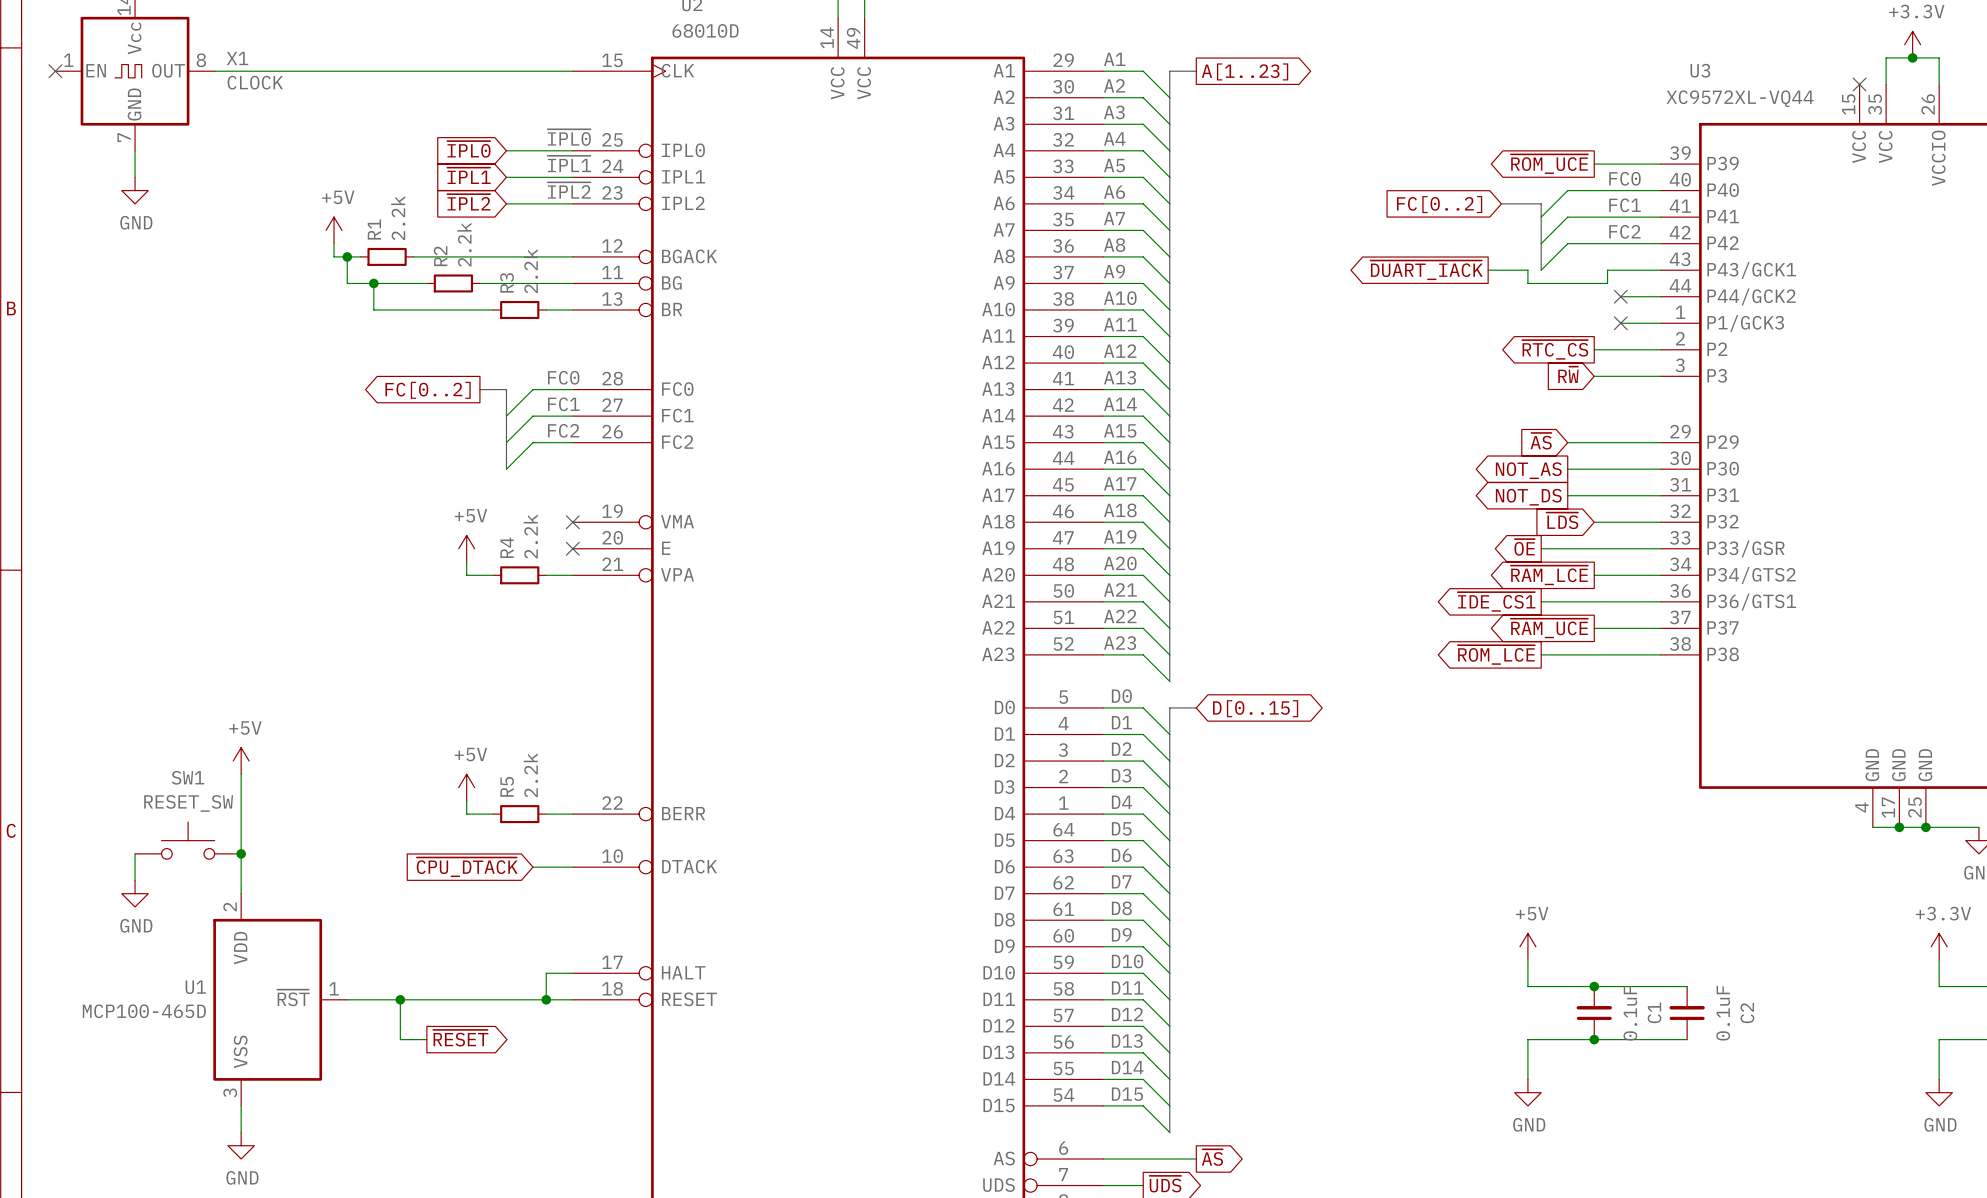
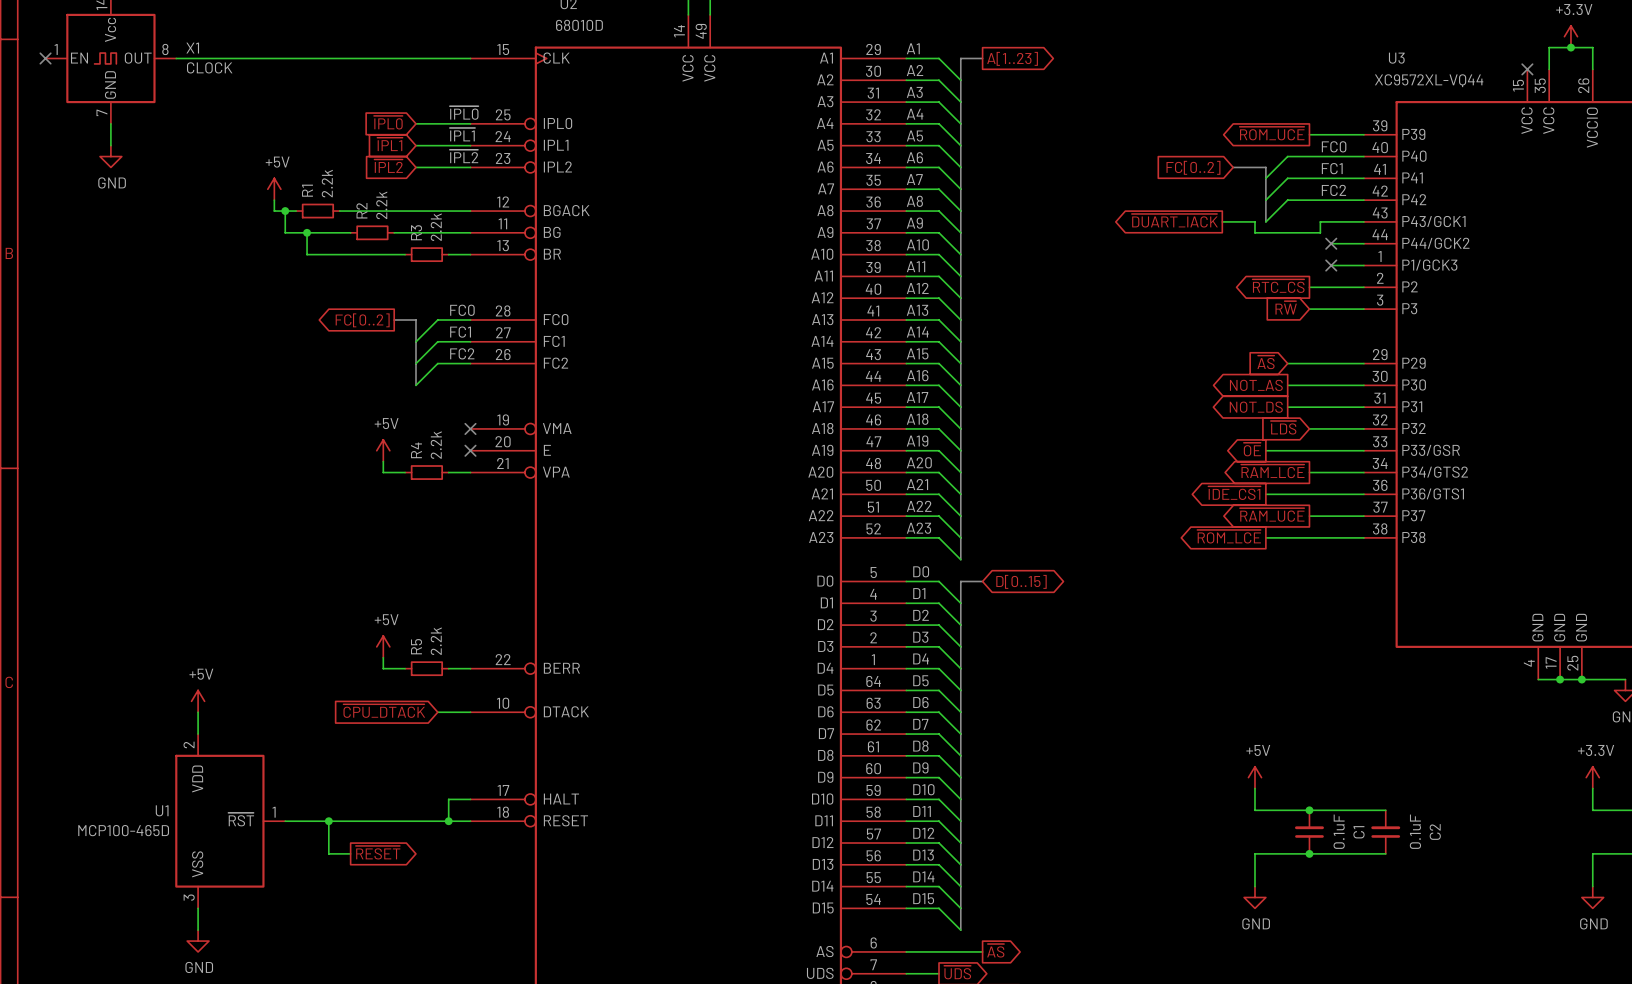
power symbol position: +5V (241, 761) -> +5V (198, 701)
wire: (241, 774) (241, 867) -> none
SW1: RESET_SW (188, 840) -> none
wire: (135, 853) (135, 880) -> none
junction: (241, 853) -> none
power symbol: GND (135, 893) -> none

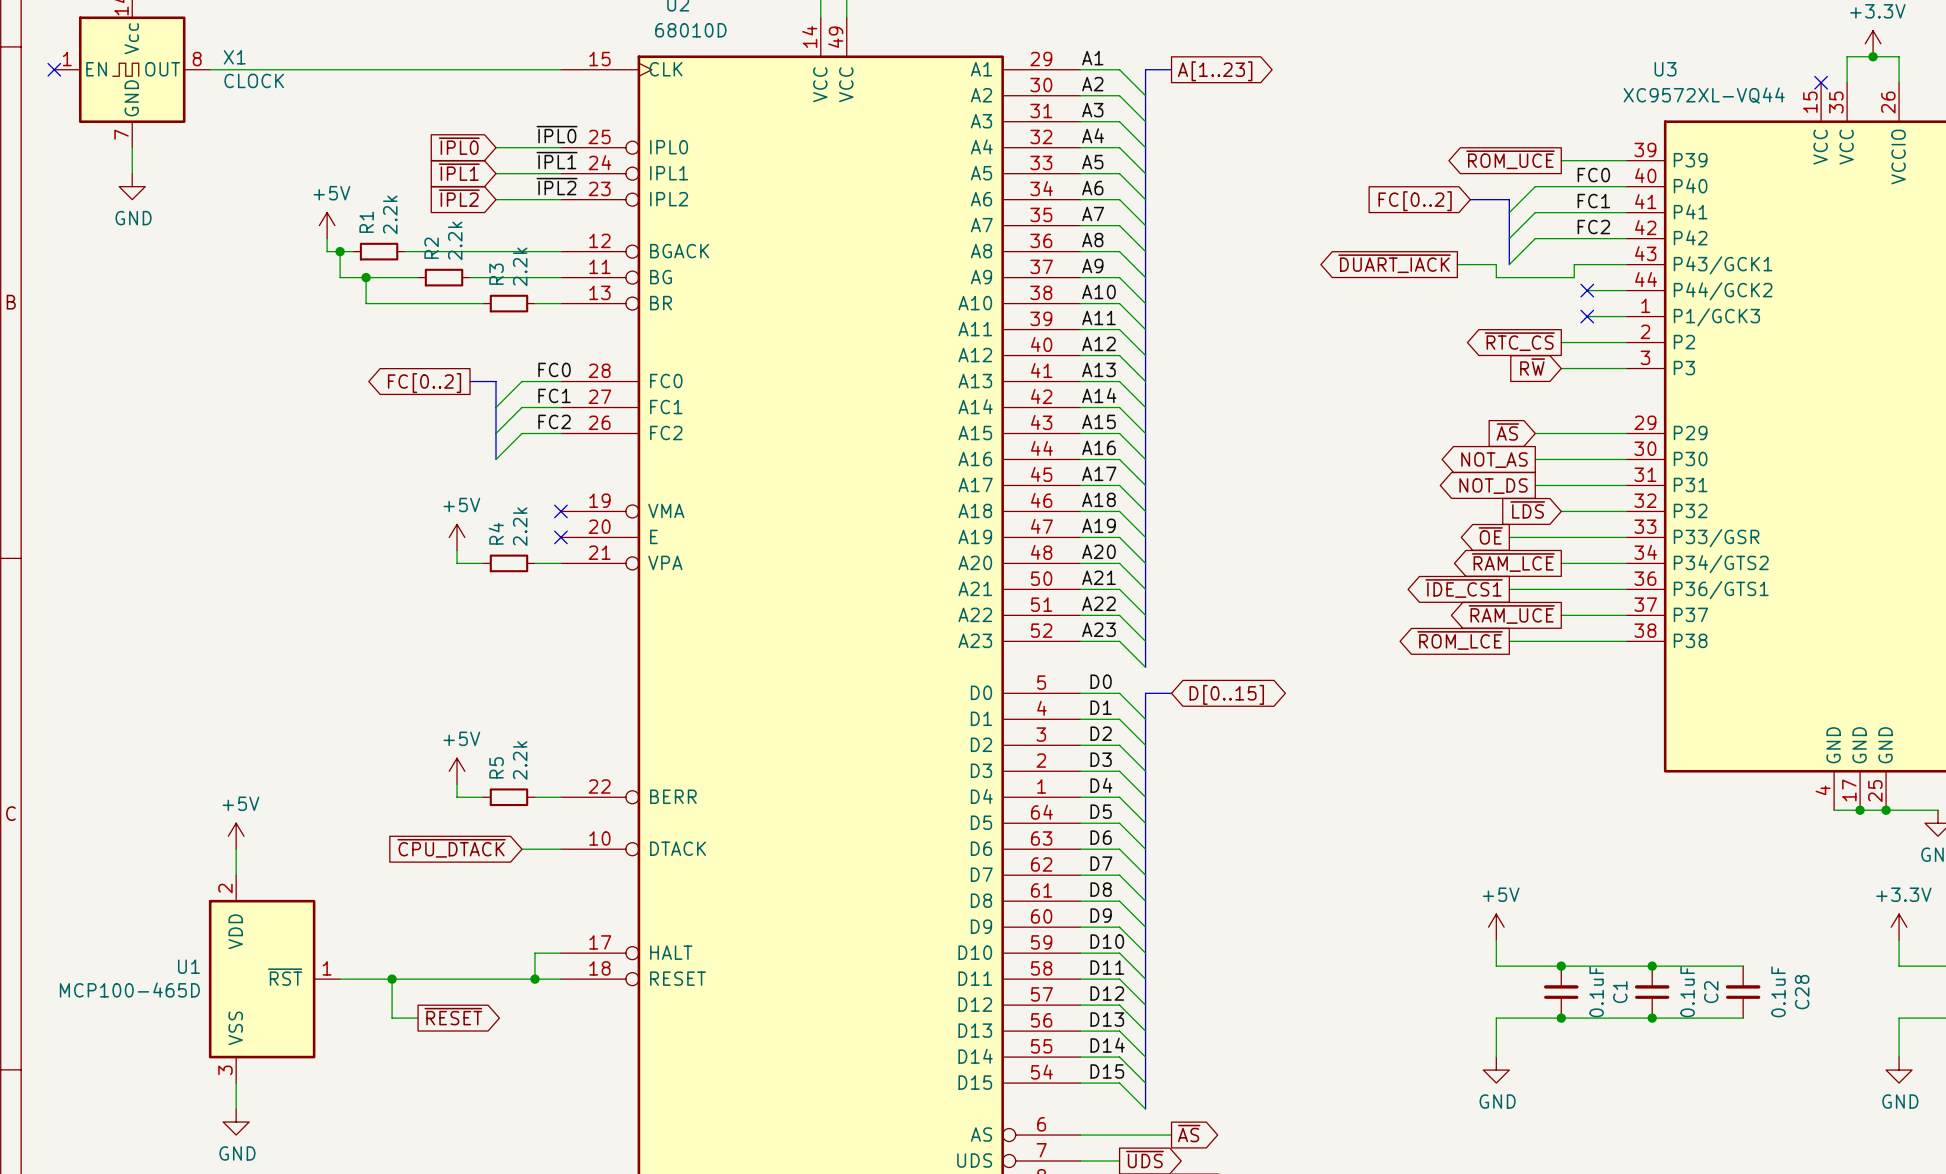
wire: none -> (1652, 966) (1743, 966)
junction: none -> (1652, 966)
C28: none -> 0.1uF (1743, 992)
wire: none -> (1652, 1018) (1743, 1018)
junction: none -> (1652, 1018)

